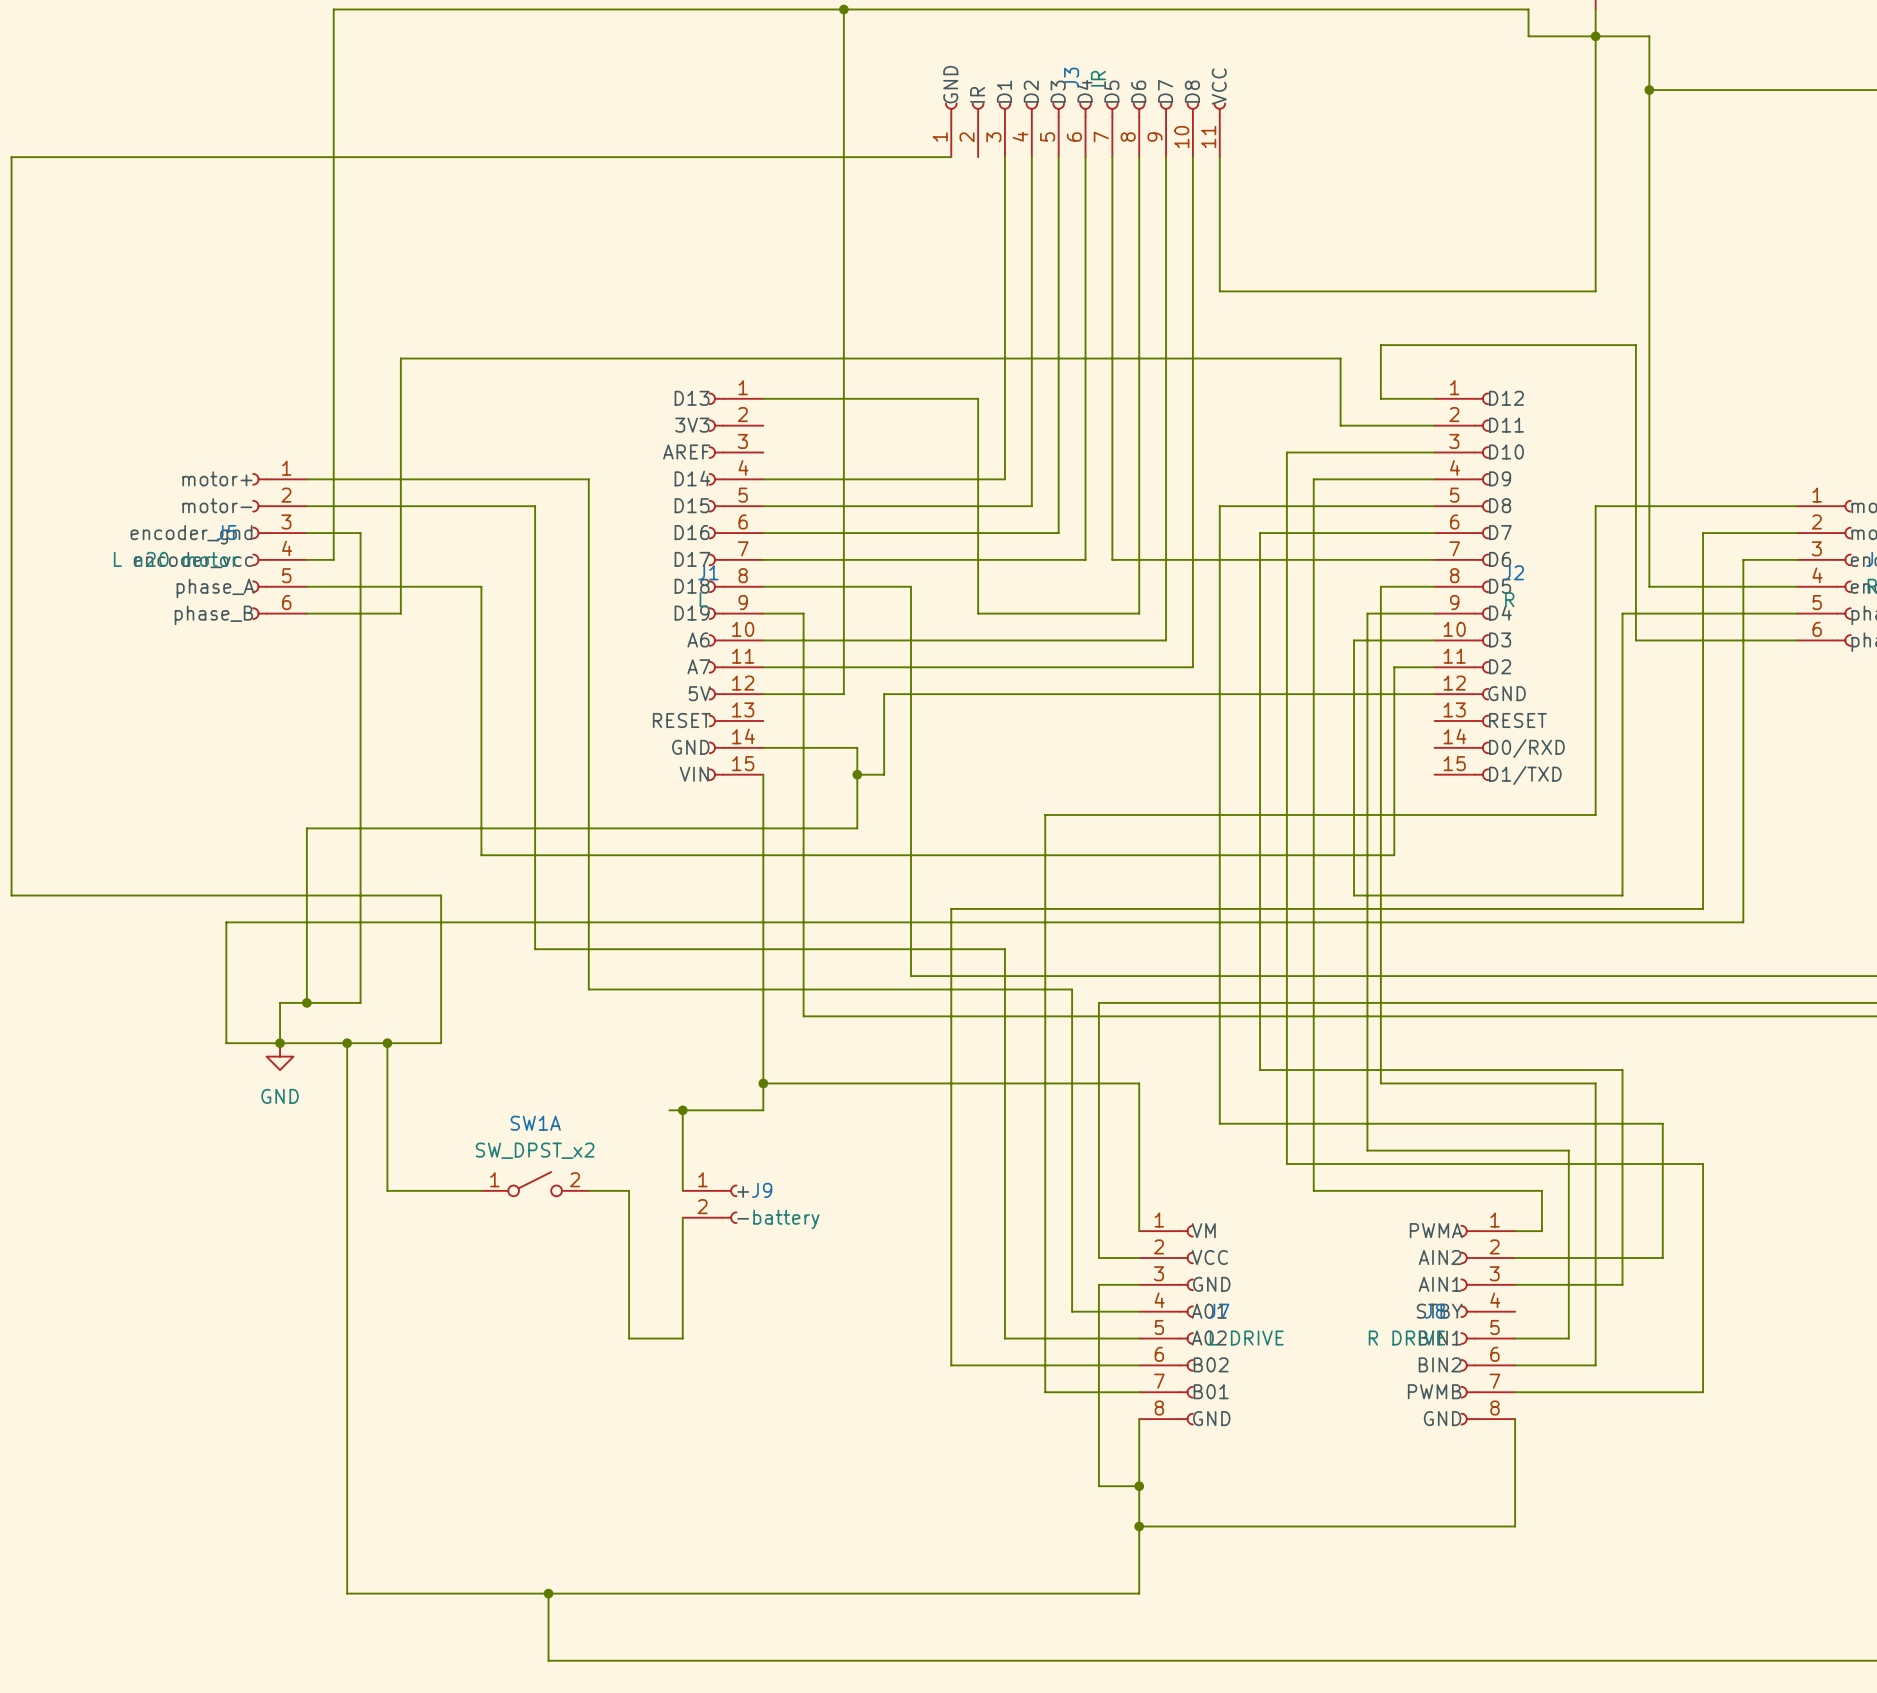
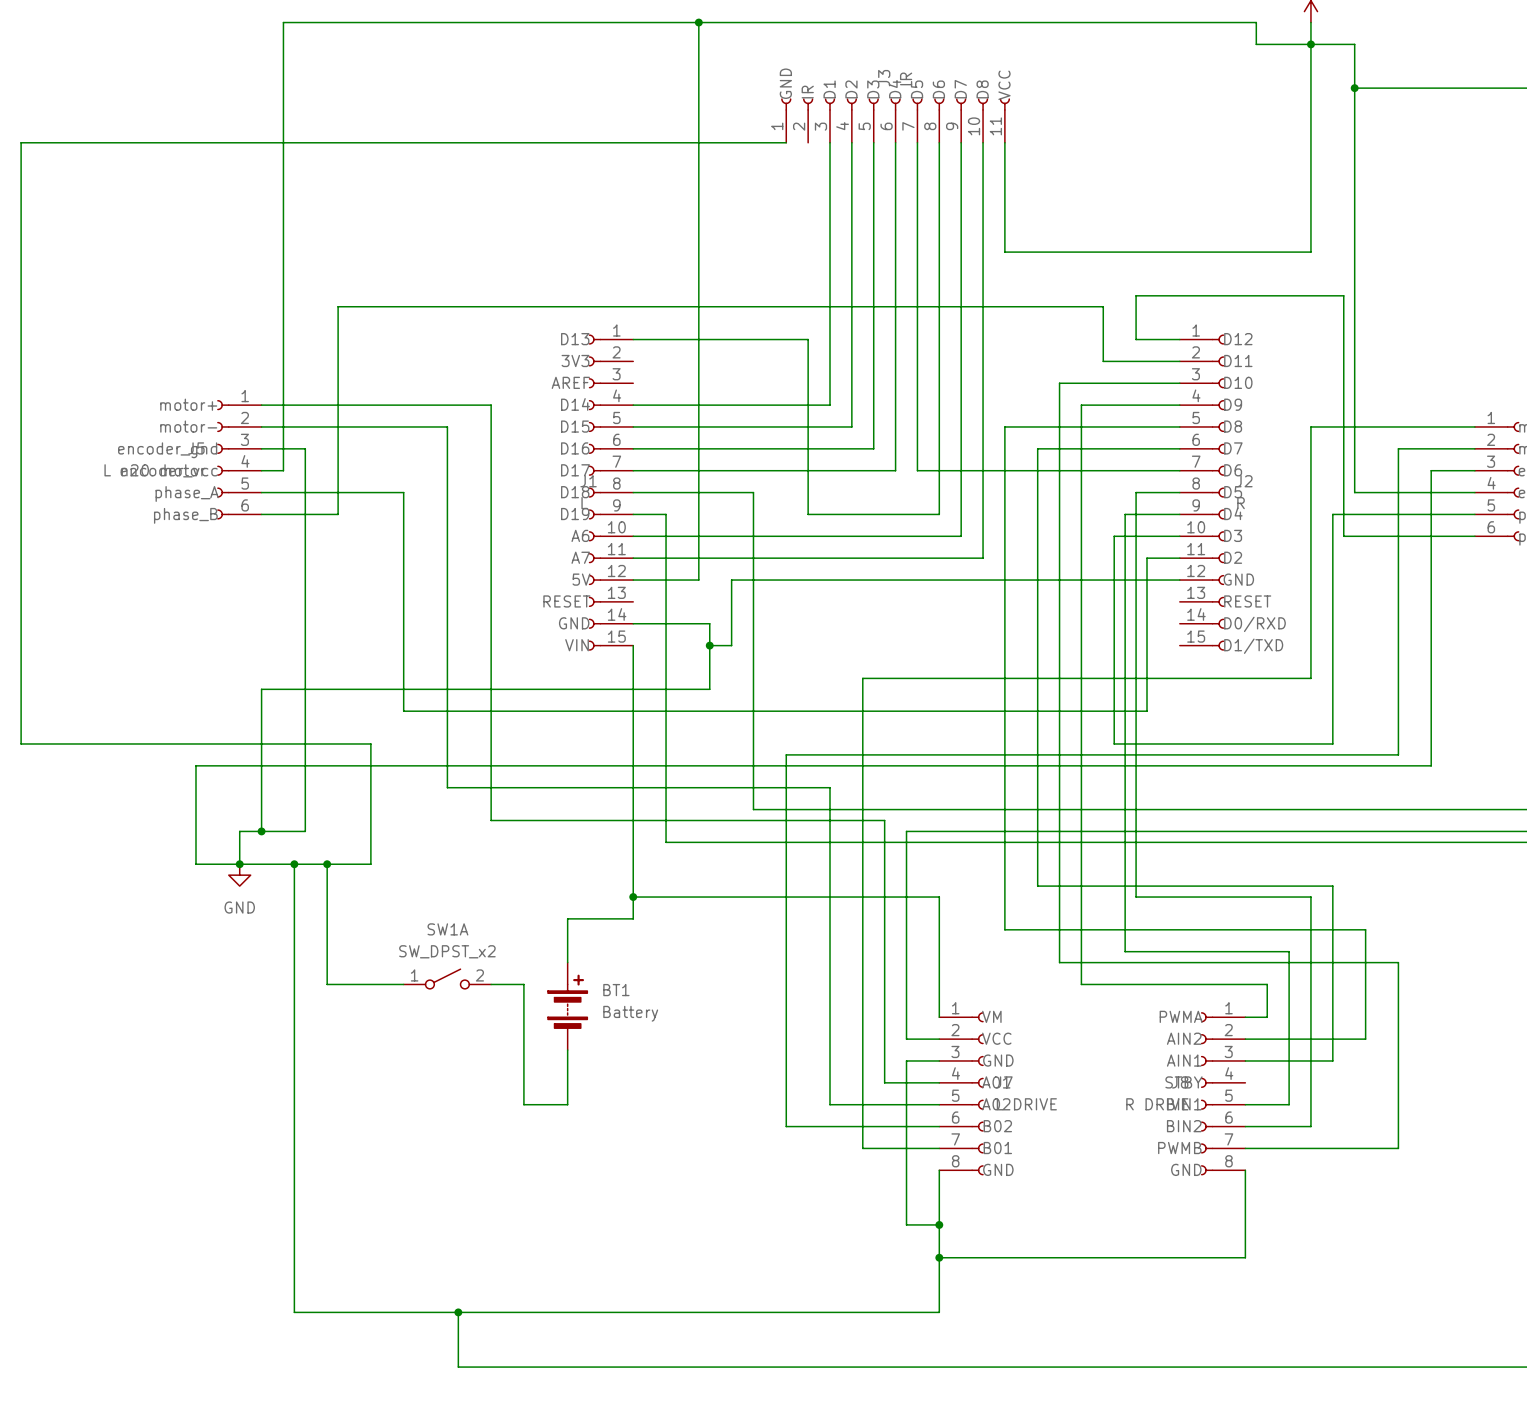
wire: (669, 1110) (682, 1110) -> none
junction: (682, 1110) -> none
J9: battery (710, 1204) -> none
BT1: none -> Battery (567, 1006)

